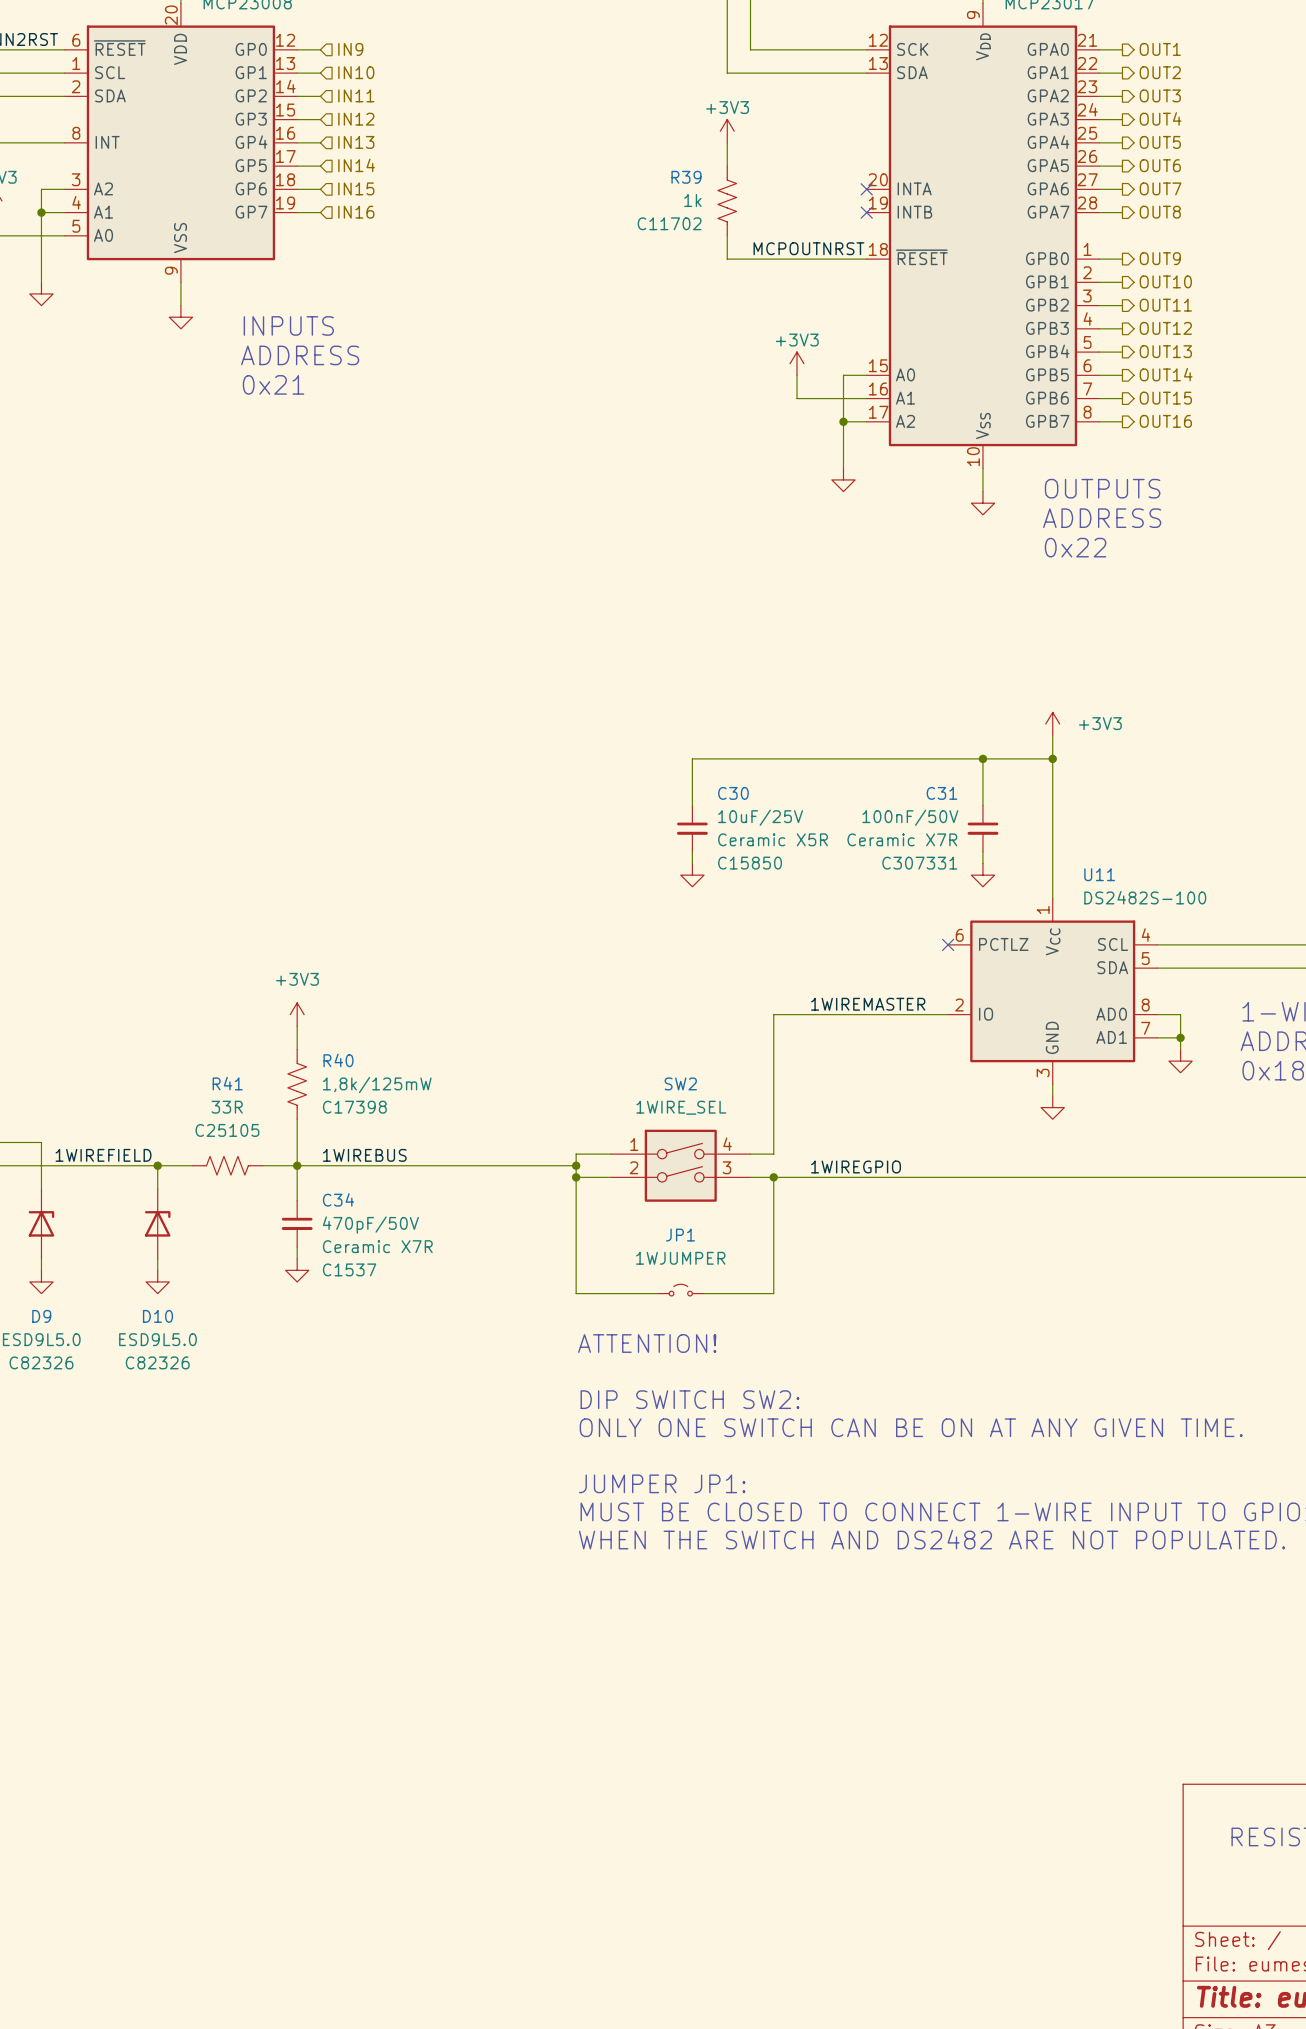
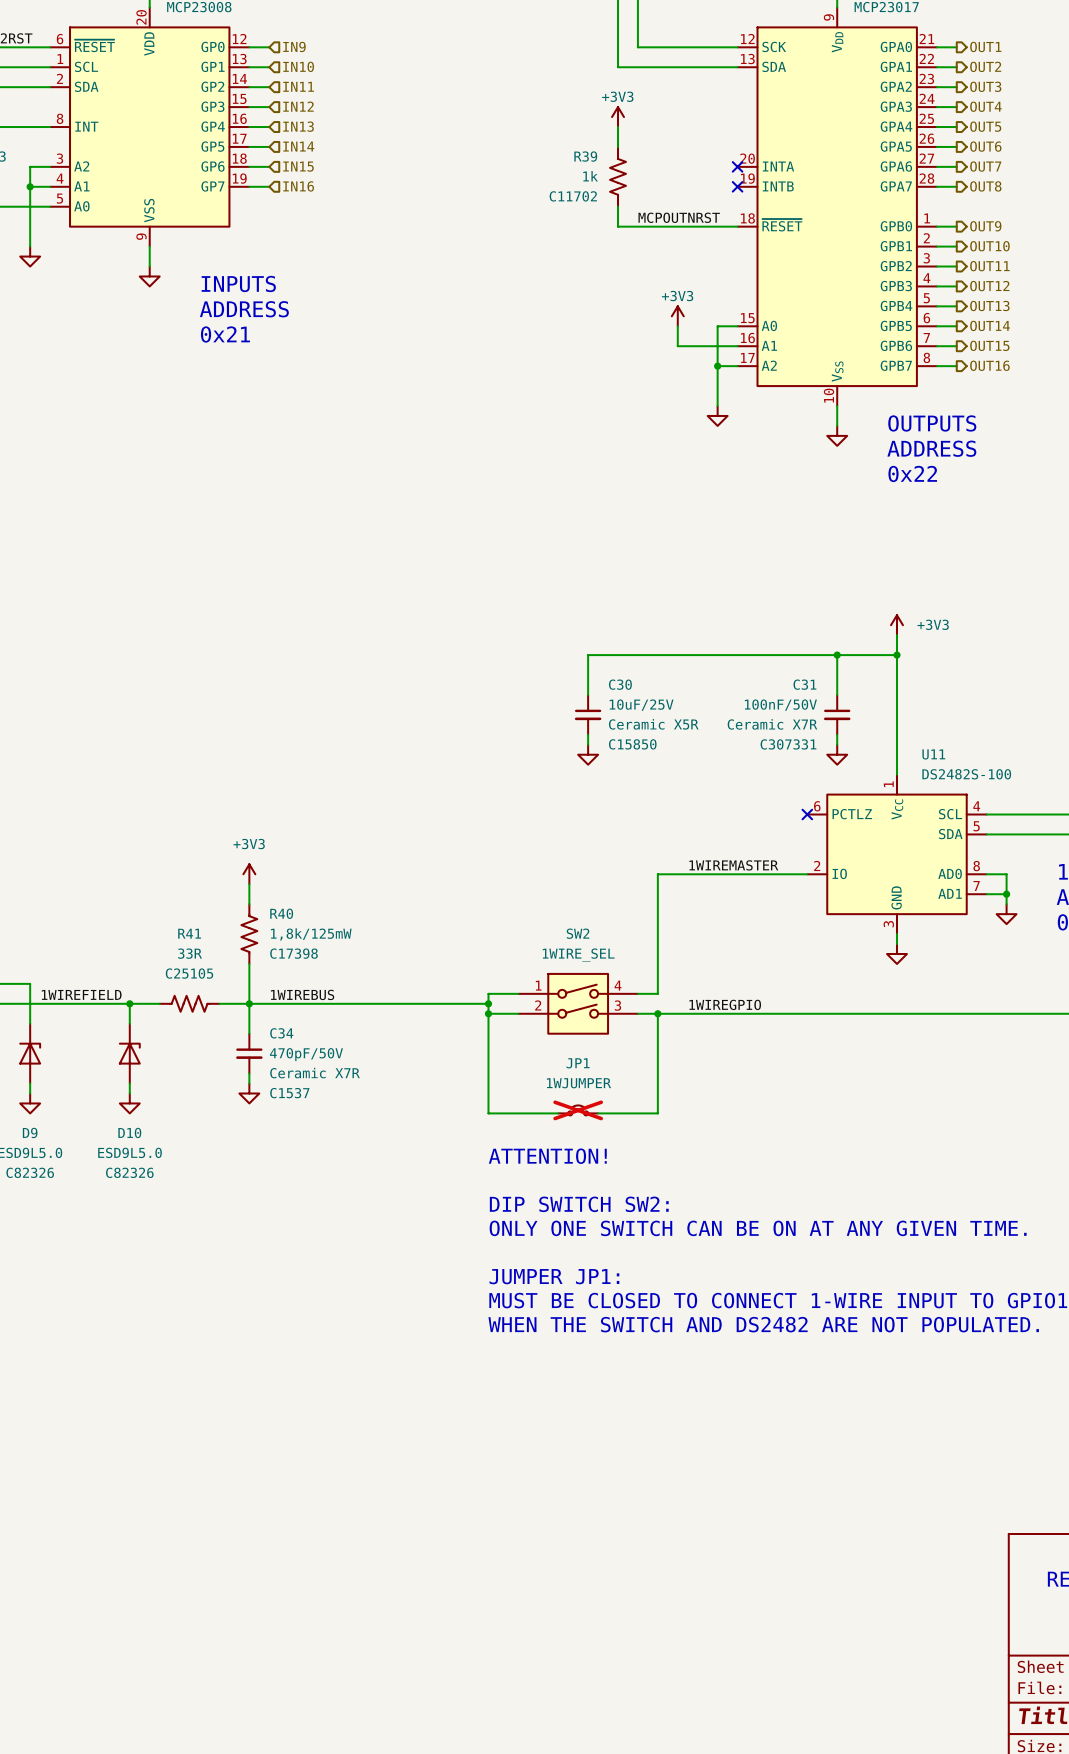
JP1 do-not-place cross: none -> (578, 1110)

